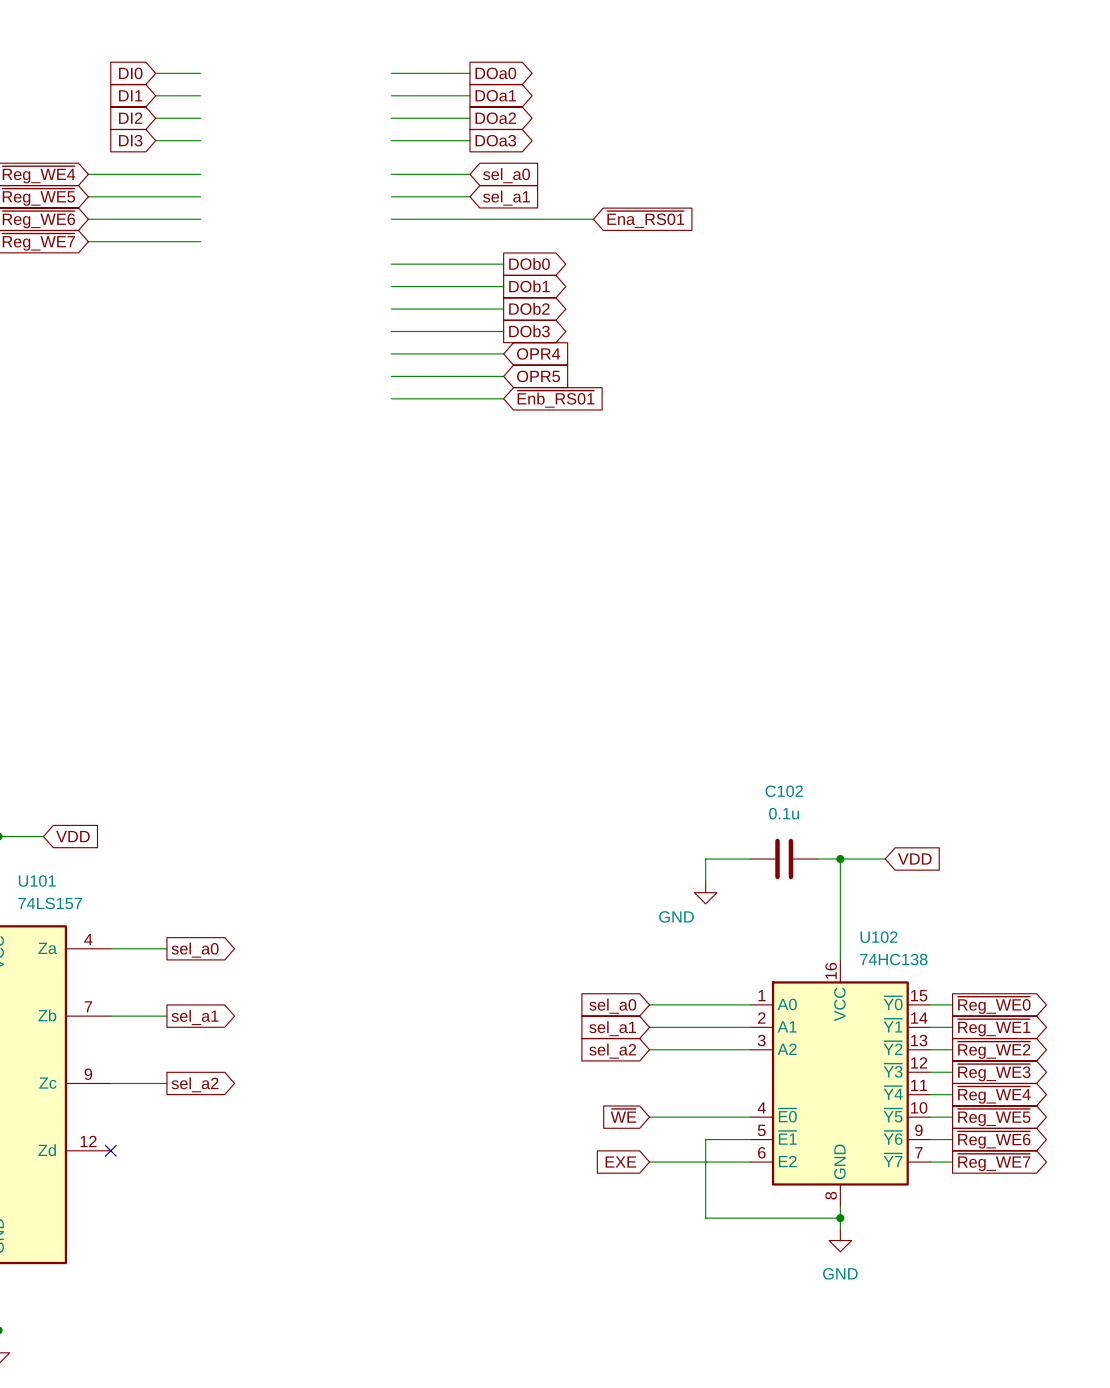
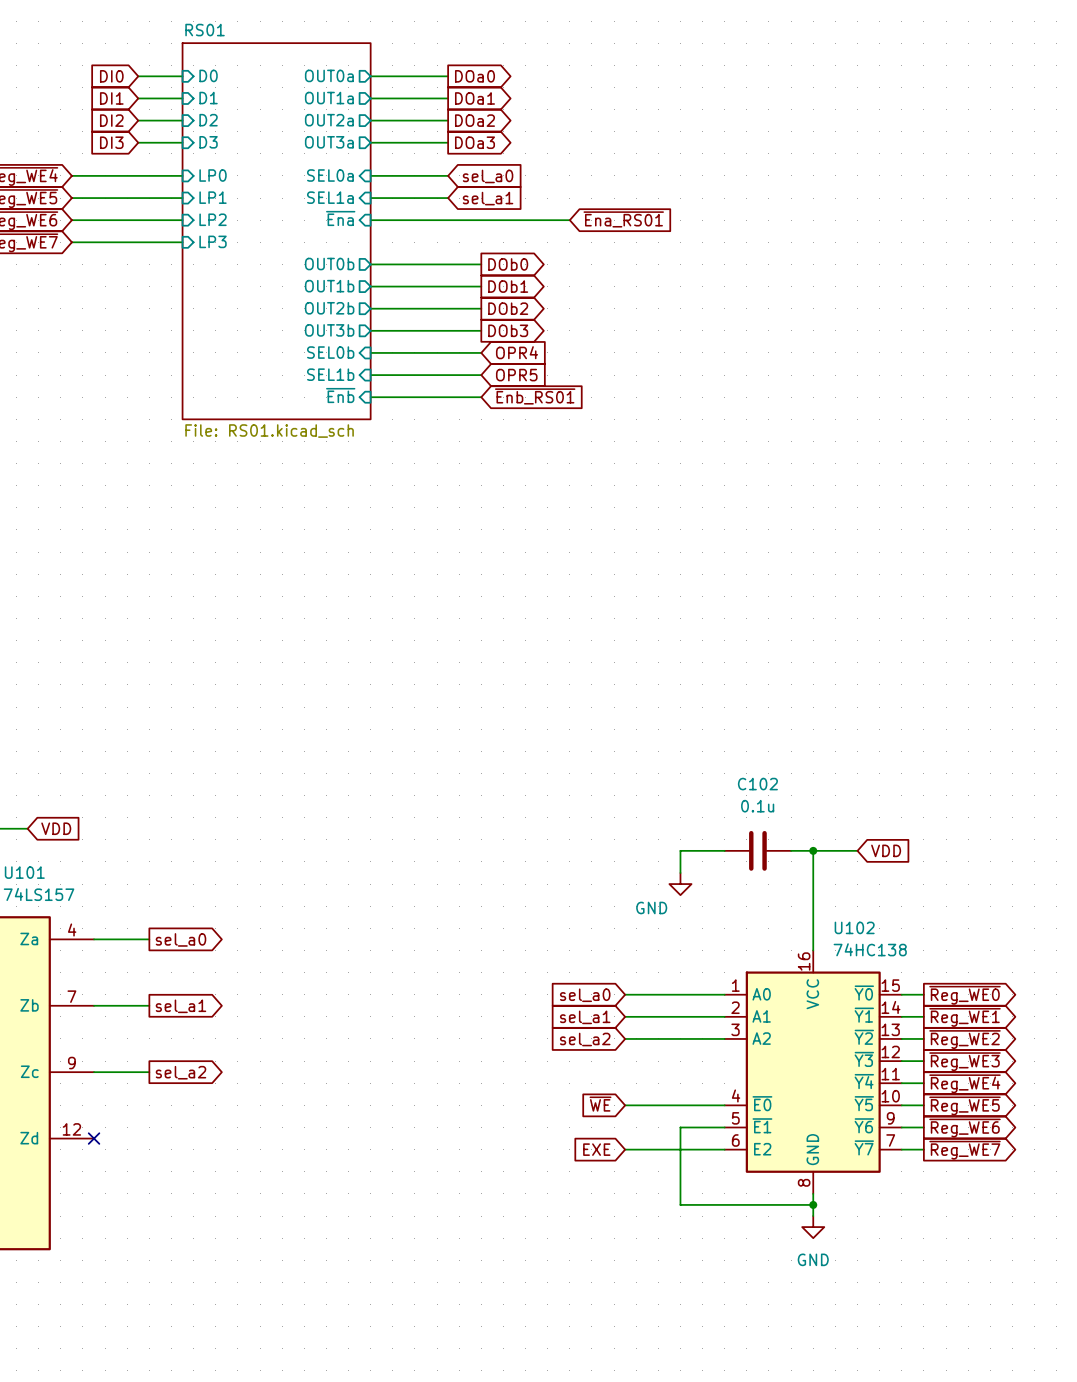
sheet pin: none -> D0 (208, 75)
sheet pin: none -> OUT0a (329, 75)
sheet pin: none -> D1 (208, 98)
sheet pin: none -> OUT1a (329, 98)
sheet pin: none -> D2 (208, 120)
sheet pin: none -> OUT2a (329, 120)
sheet pin: none -> D3 (208, 142)
sheet pin: none -> OUT3a (329, 142)
sheet pin: none -> LP0 (213, 175)
sheet pin: none -> SEL0a (330, 175)
sheet pin: none -> LP1 (213, 197)
sheet pin: none -> SEL1a (330, 197)
sheet pin: none -> ~{Ena} (340, 218)
sheet pin: none -> LP2 (213, 219)
sheet RS01: none -> File: RS01.kicad_sch (276, 231)
sheet pin: none -> LP3 (213, 241)
sheet pin: none -> OUT0b (329, 264)
sheet pin: none -> OUT1b (329, 286)
sheet pin: none -> OUT2b (329, 308)
sheet pin: none -> OUT3b (329, 330)
sheet pin: none -> SEL0b (330, 352)
sheet pin: none -> SEL1b (330, 374)
sheet pin: none -> ~{Enb} (340, 395)

